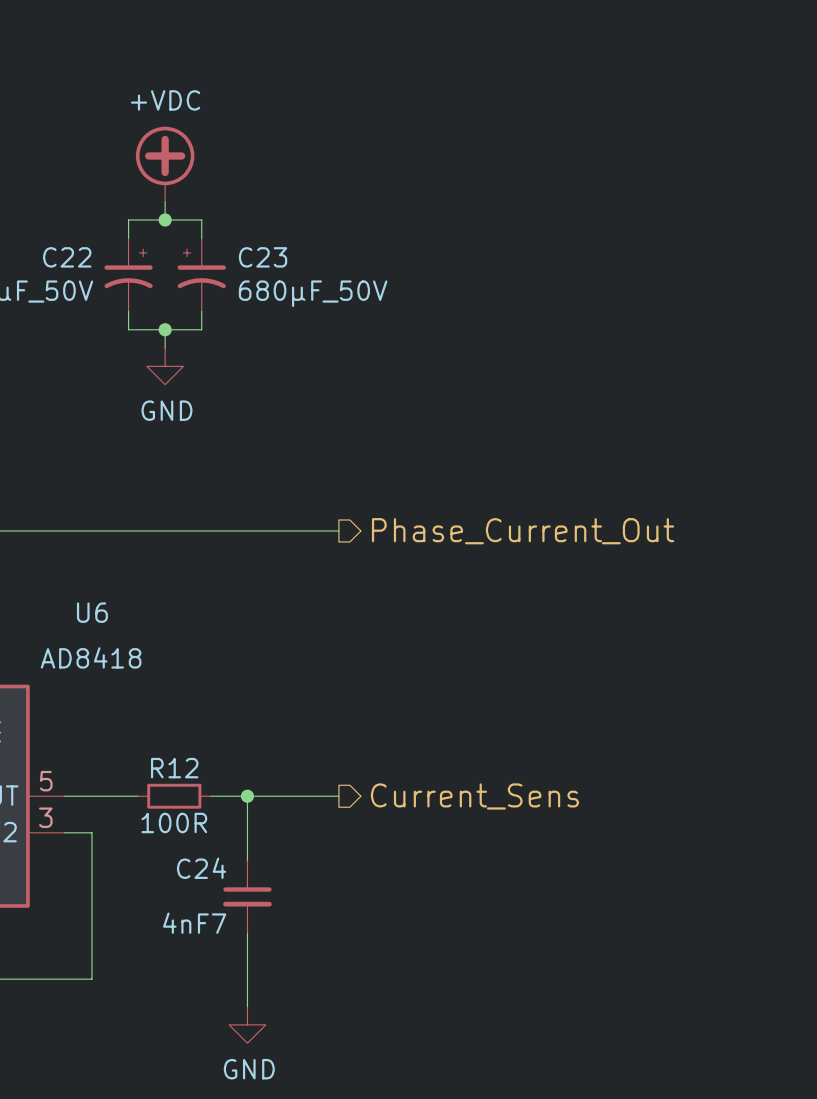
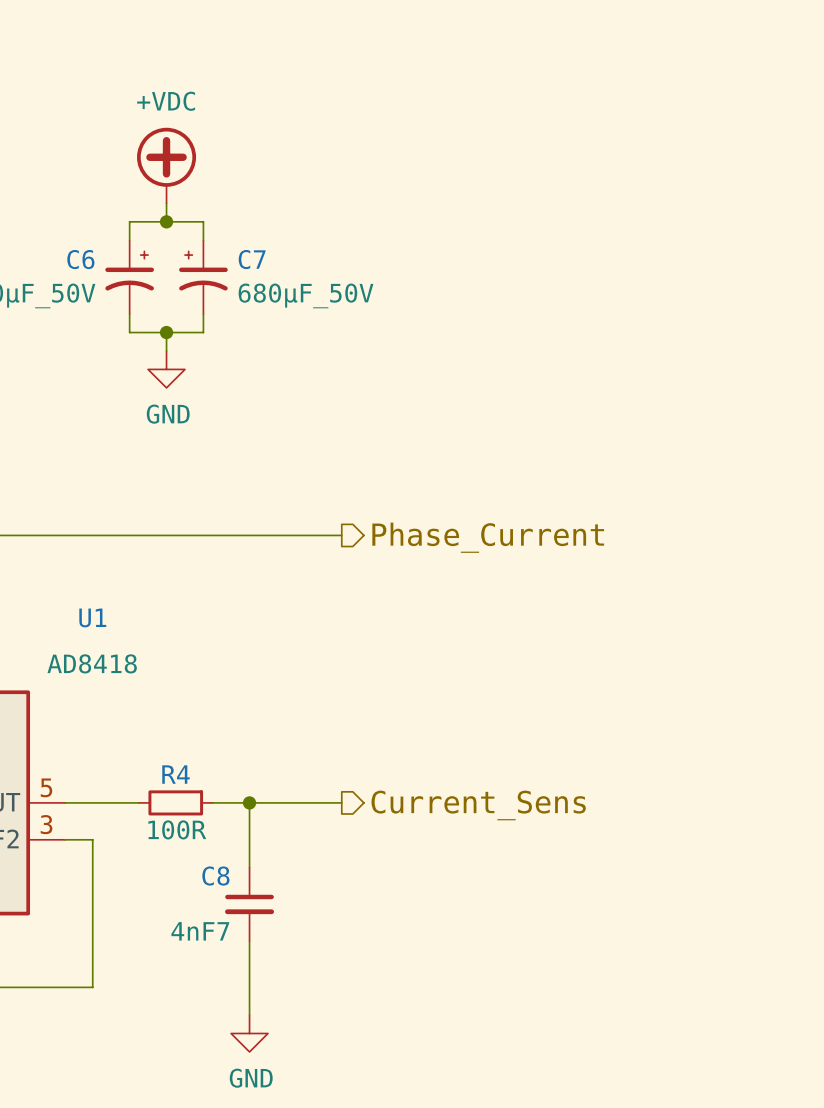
C22 name: C22 (67, 257) -> C6 (80, 259)
C23 name: C23 (263, 257) -> C7 (252, 259)
hierarchical label: Phase_Current_Out (523, 531) -> Phase_Current (488, 537)
U6 name: U6 (92, 612) -> U1 (92, 617)
R12 name: R12 (174, 768) -> R4 (176, 774)
C24 name: C24 (201, 868) -> C8 (215, 876)

